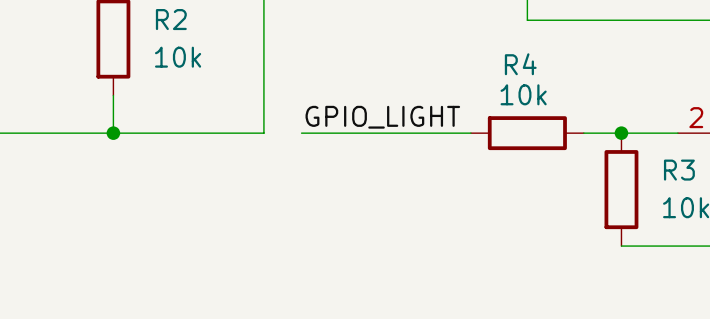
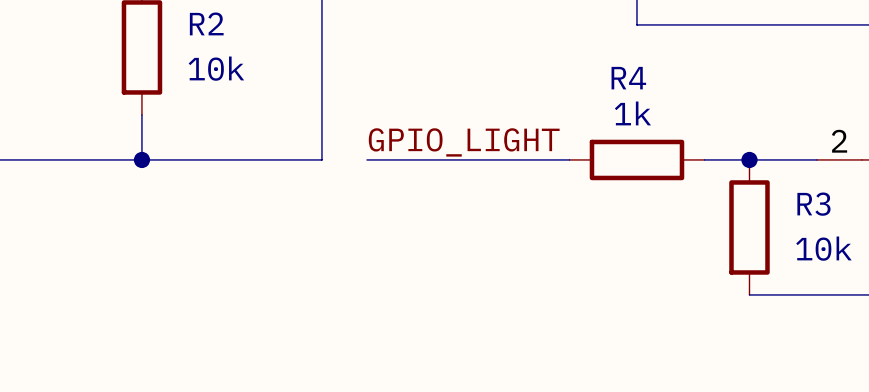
R4 value: 10k (523, 94) -> 1k (632, 113)

